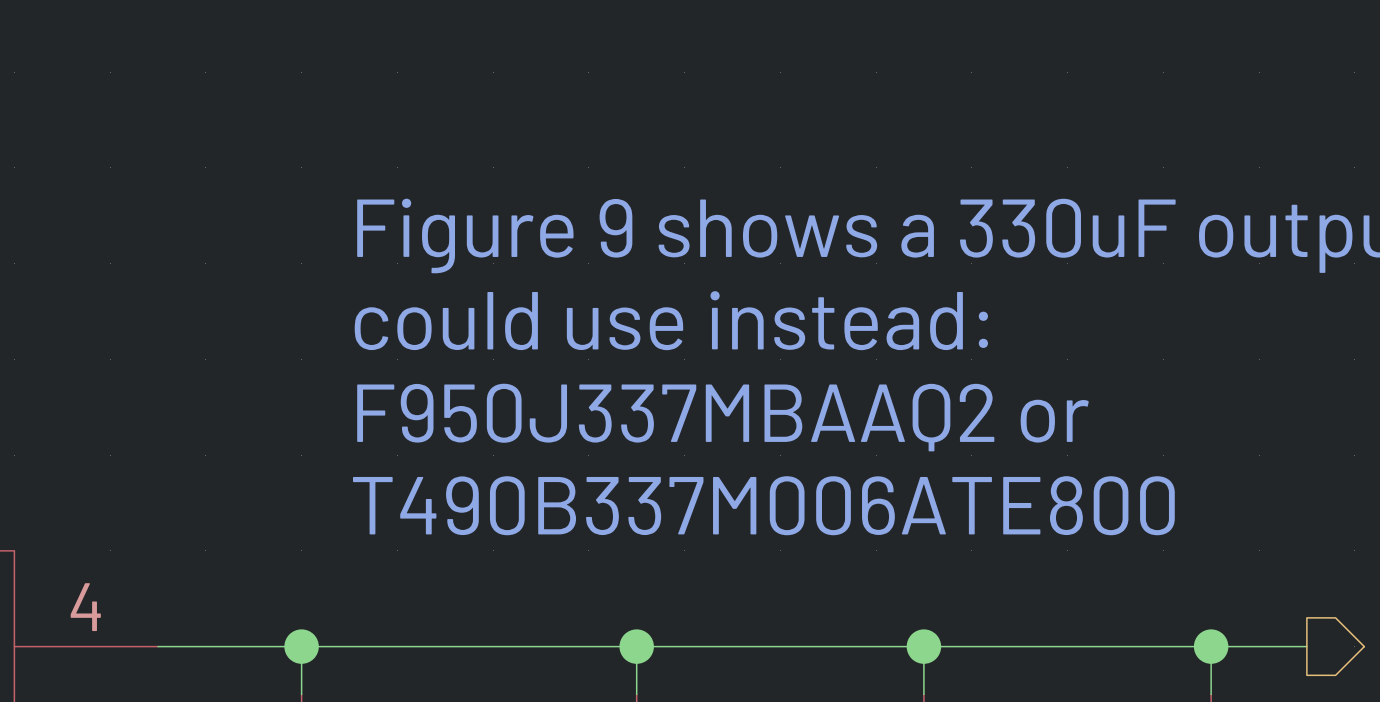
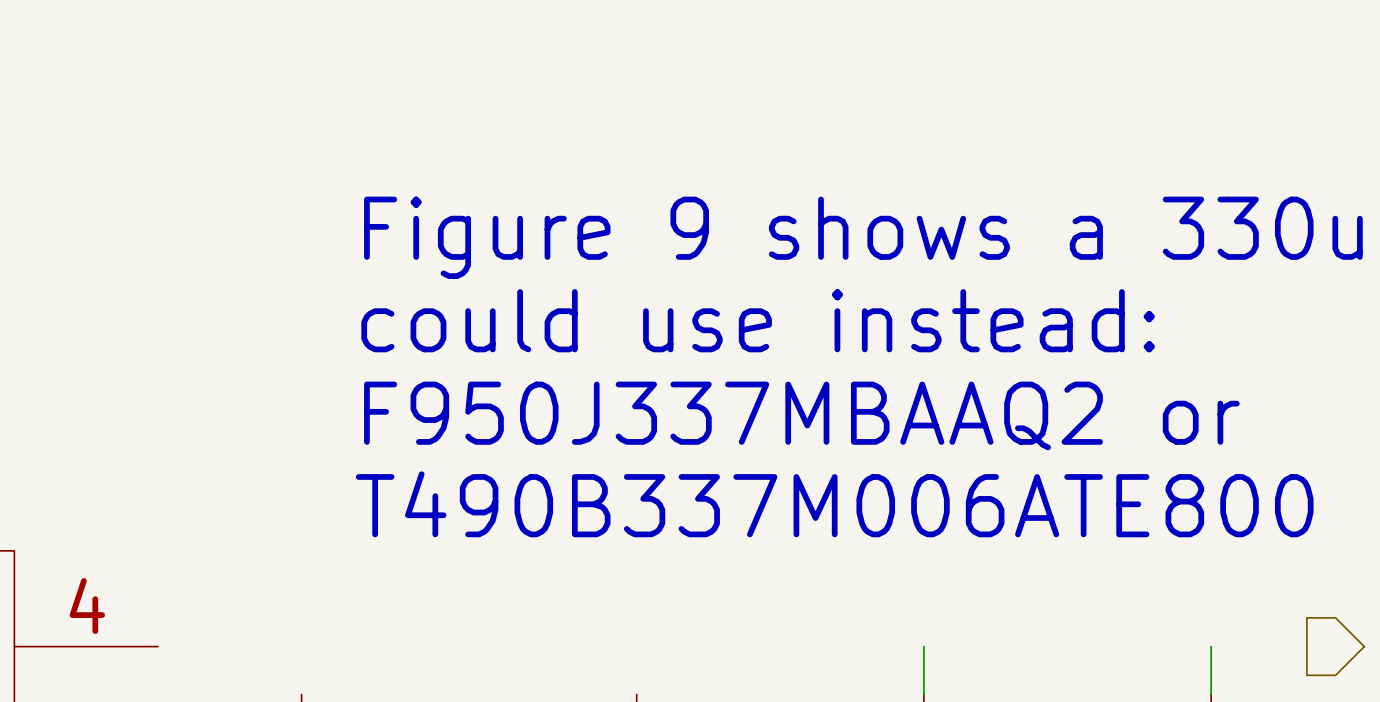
wire: (157, 646) (1306, 646) -> none
wire: (301, 646) (301, 694) -> none
junction: (301, 646) -> none
wire: (636, 646) (636, 694) -> none
junction: (636, 646) -> none
junction: (923, 646) -> none
junction: (1211, 646) -> none

